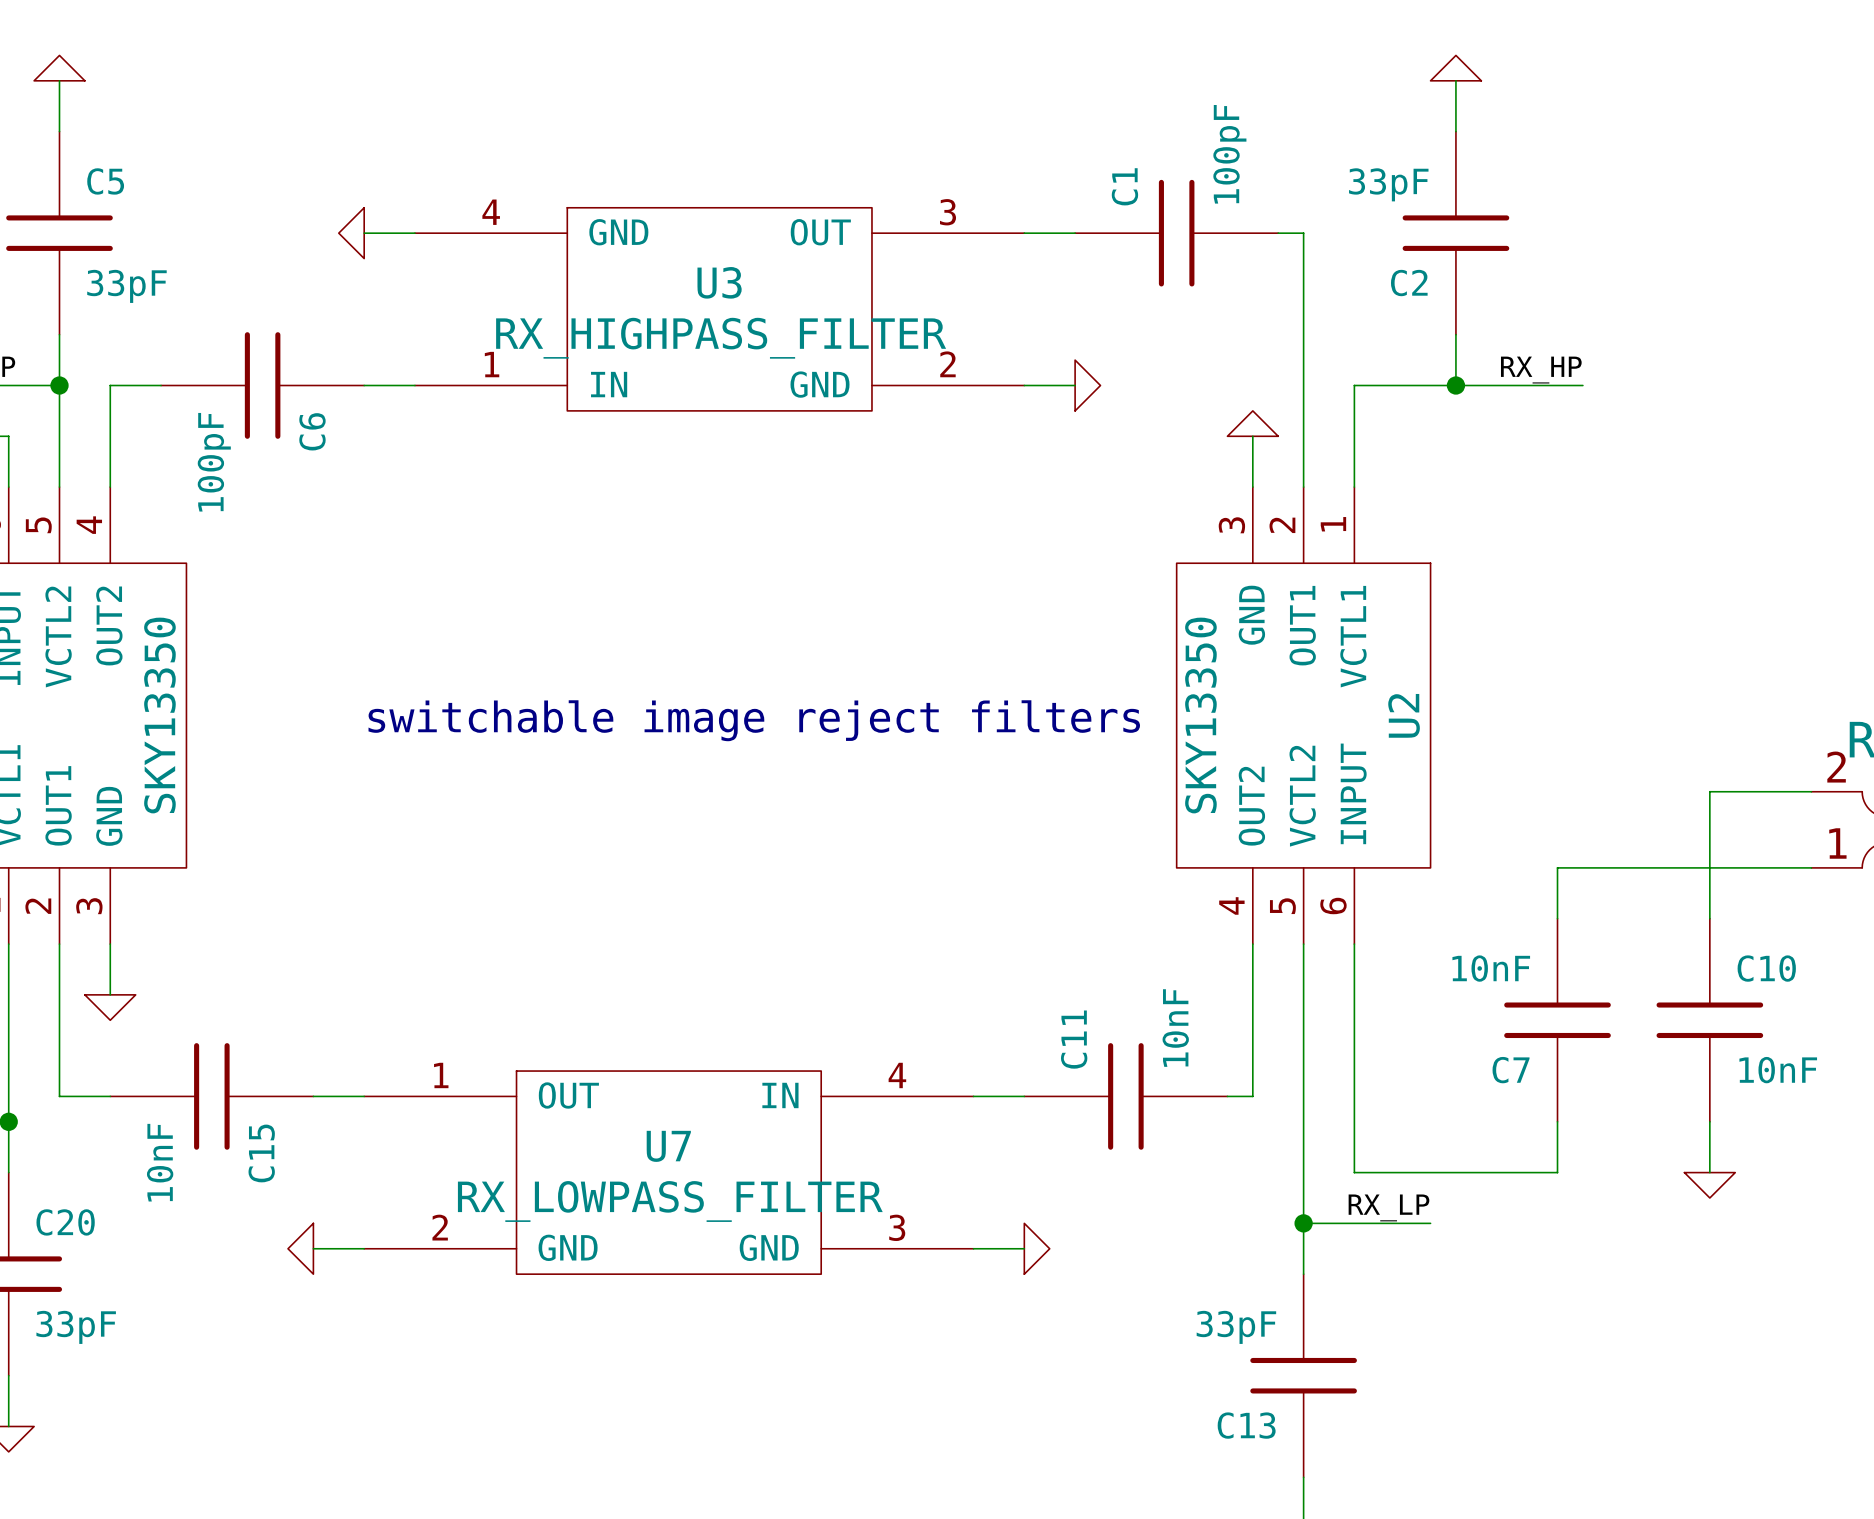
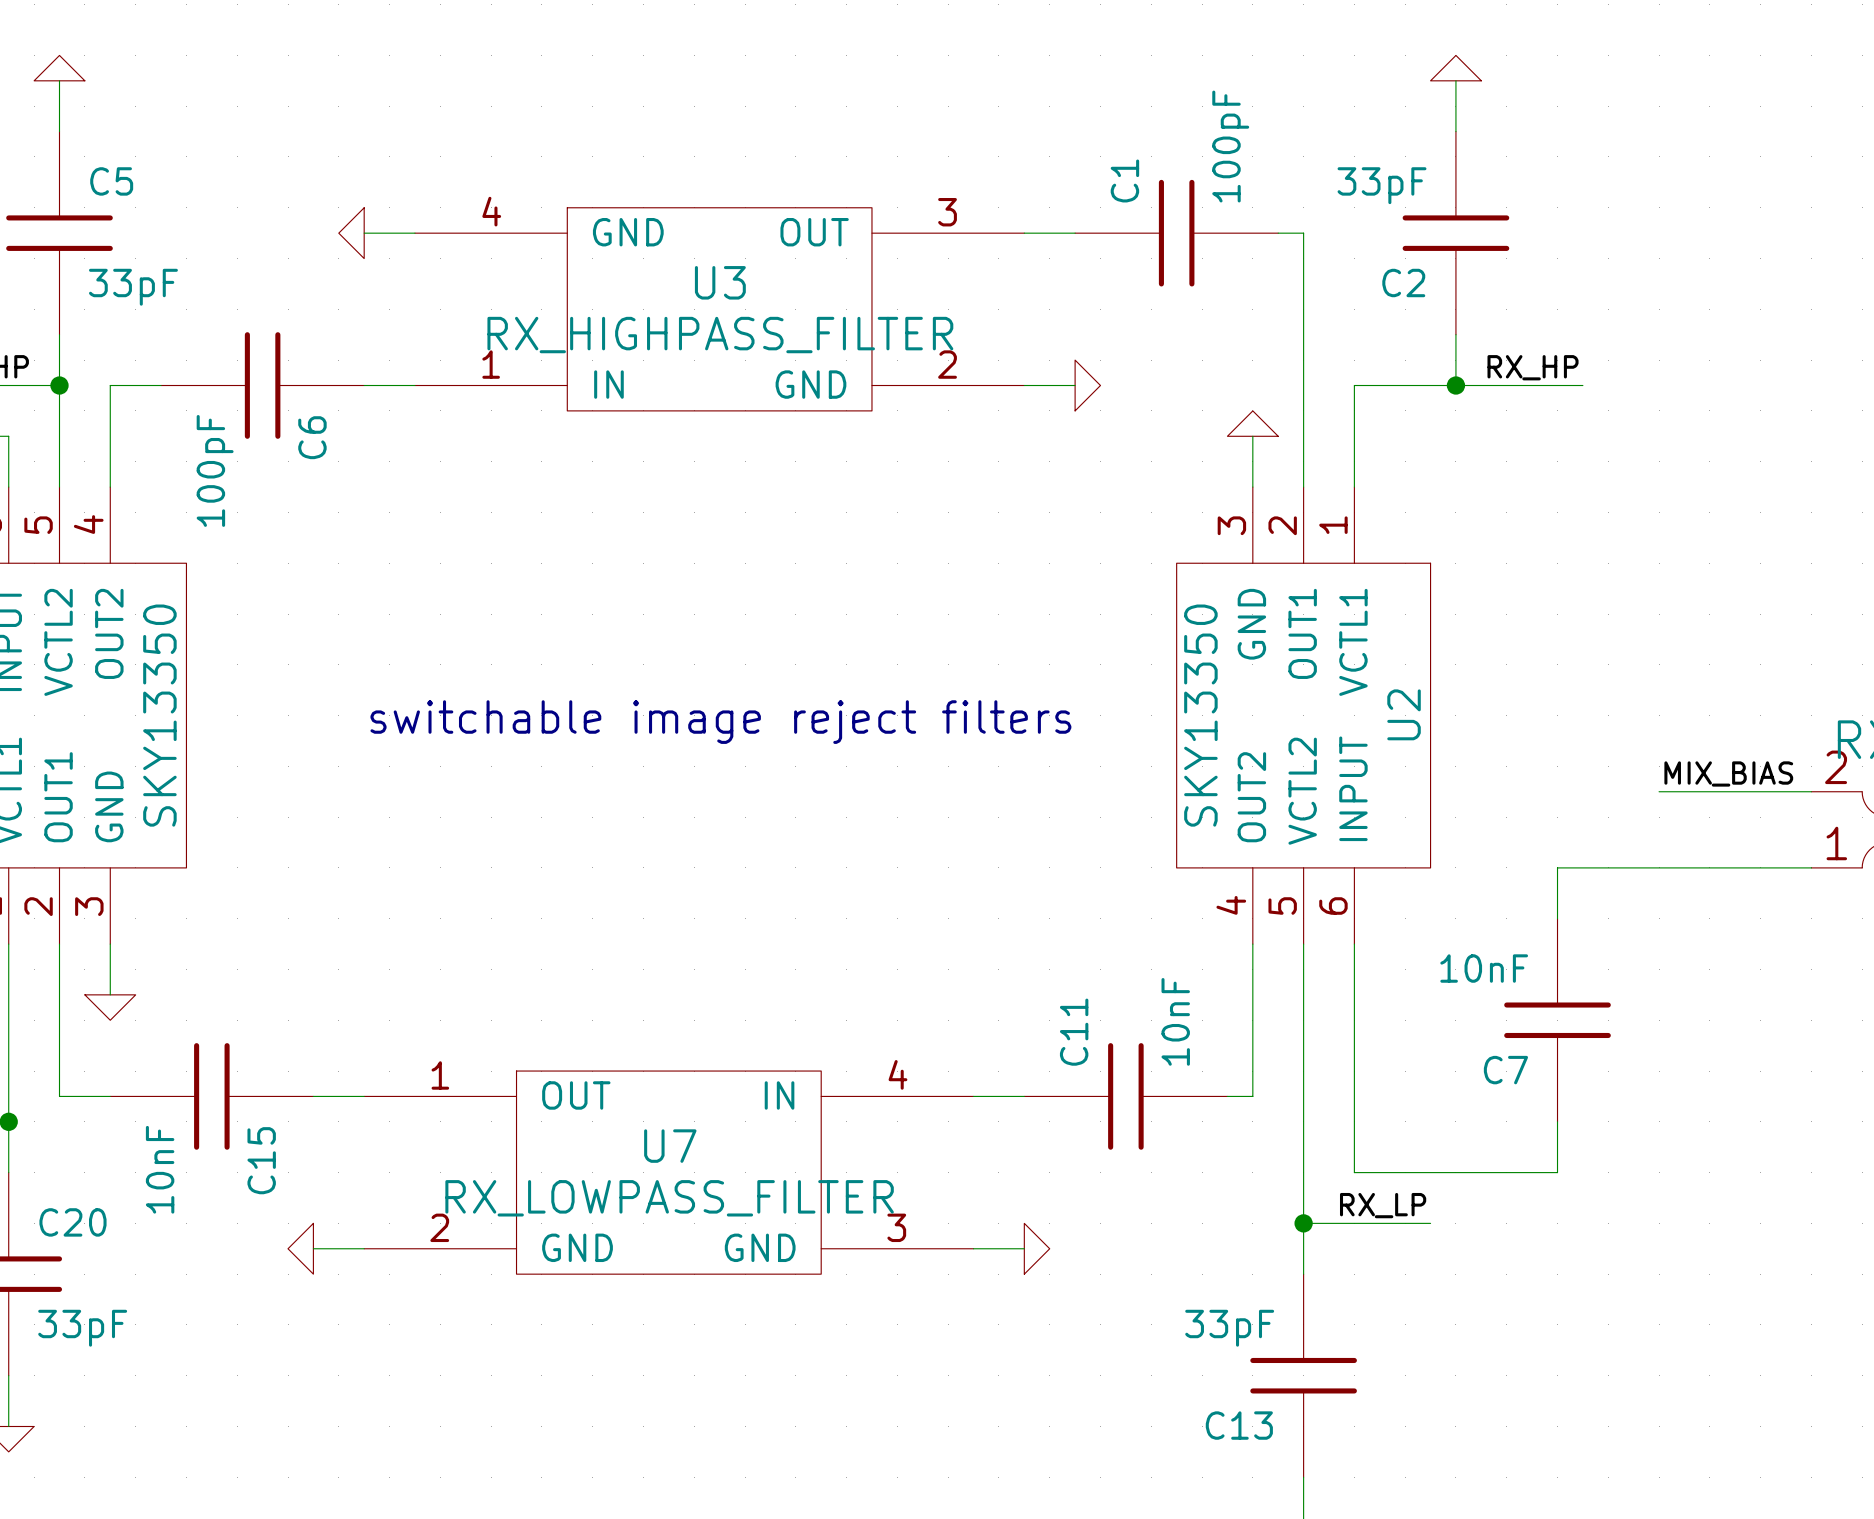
label: none -> MIX_BIAS (1728, 773)
wire: (1709, 791) (1709, 918) -> (1709, 791) (1659, 791)
C10: 10nF (1709, 1020) -> none
wire: (1709, 1121) (1709, 1172) -> none
power symbol: (1709, 1185) -> none

